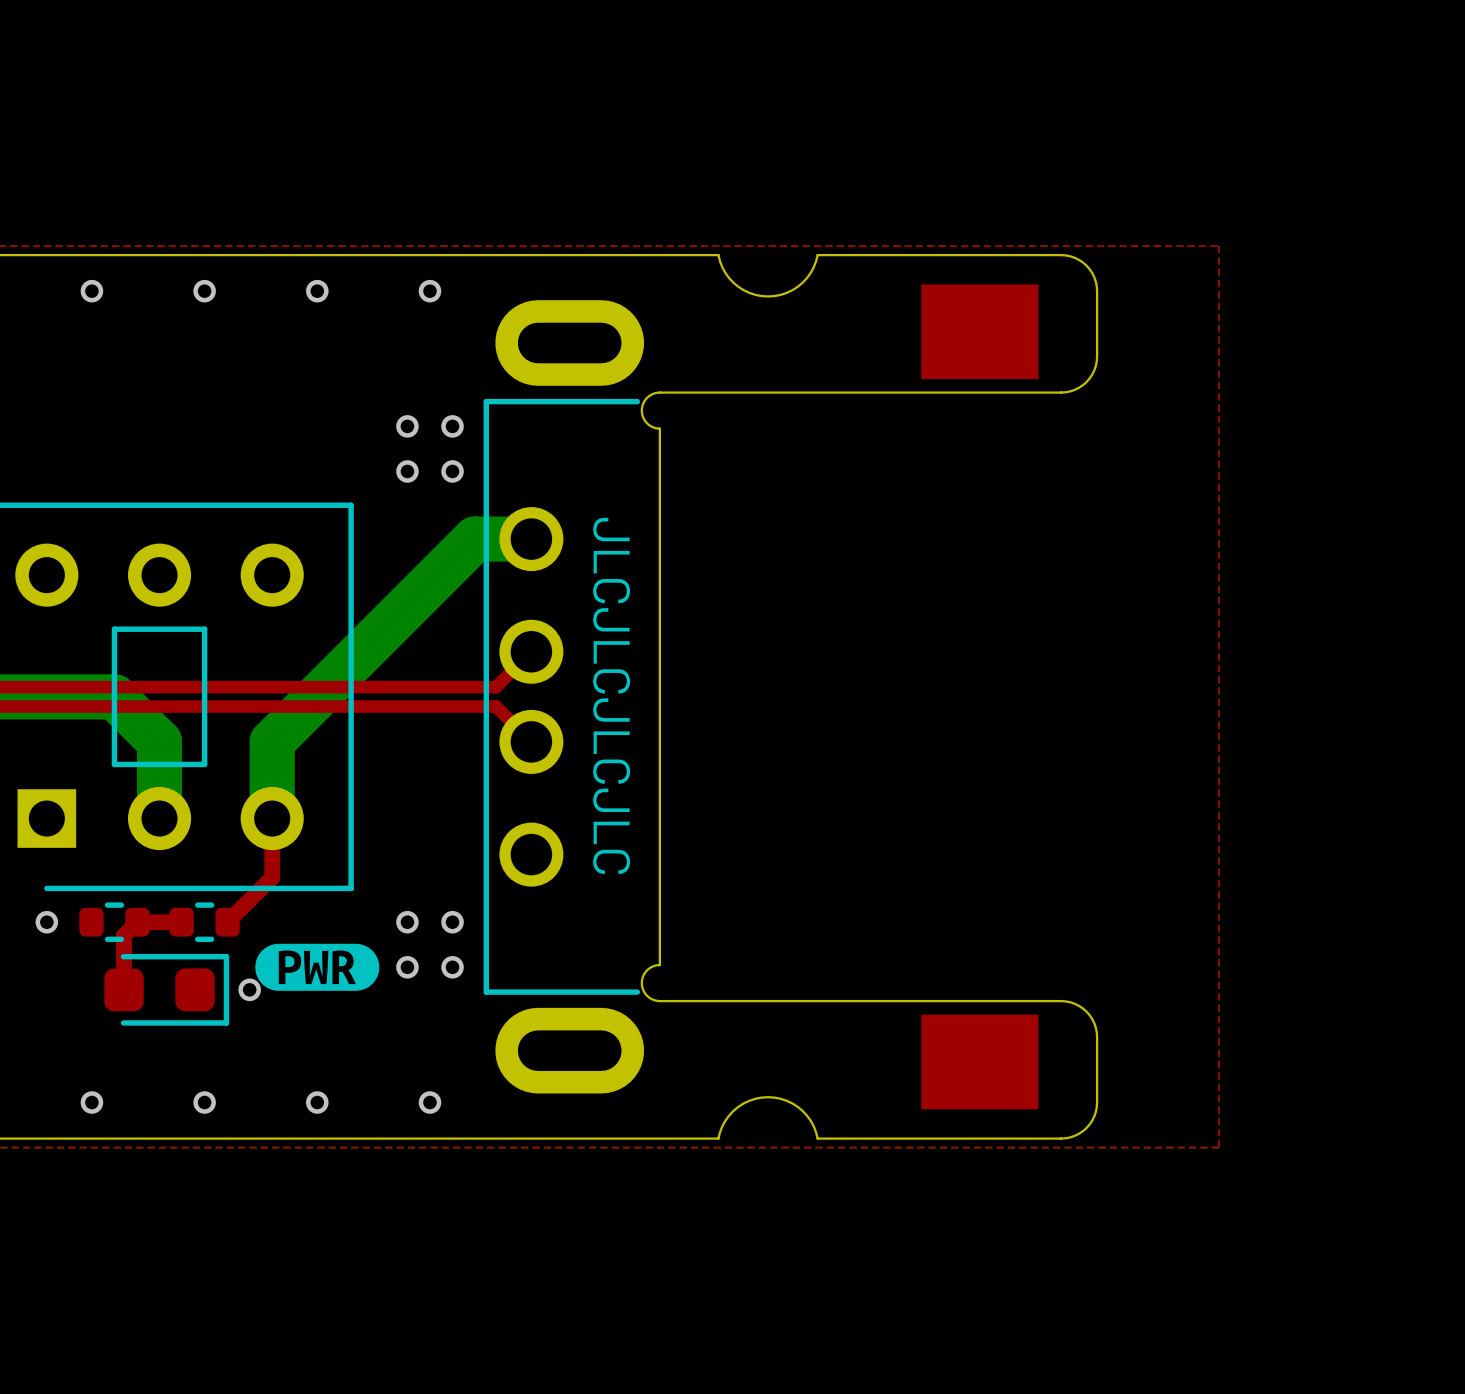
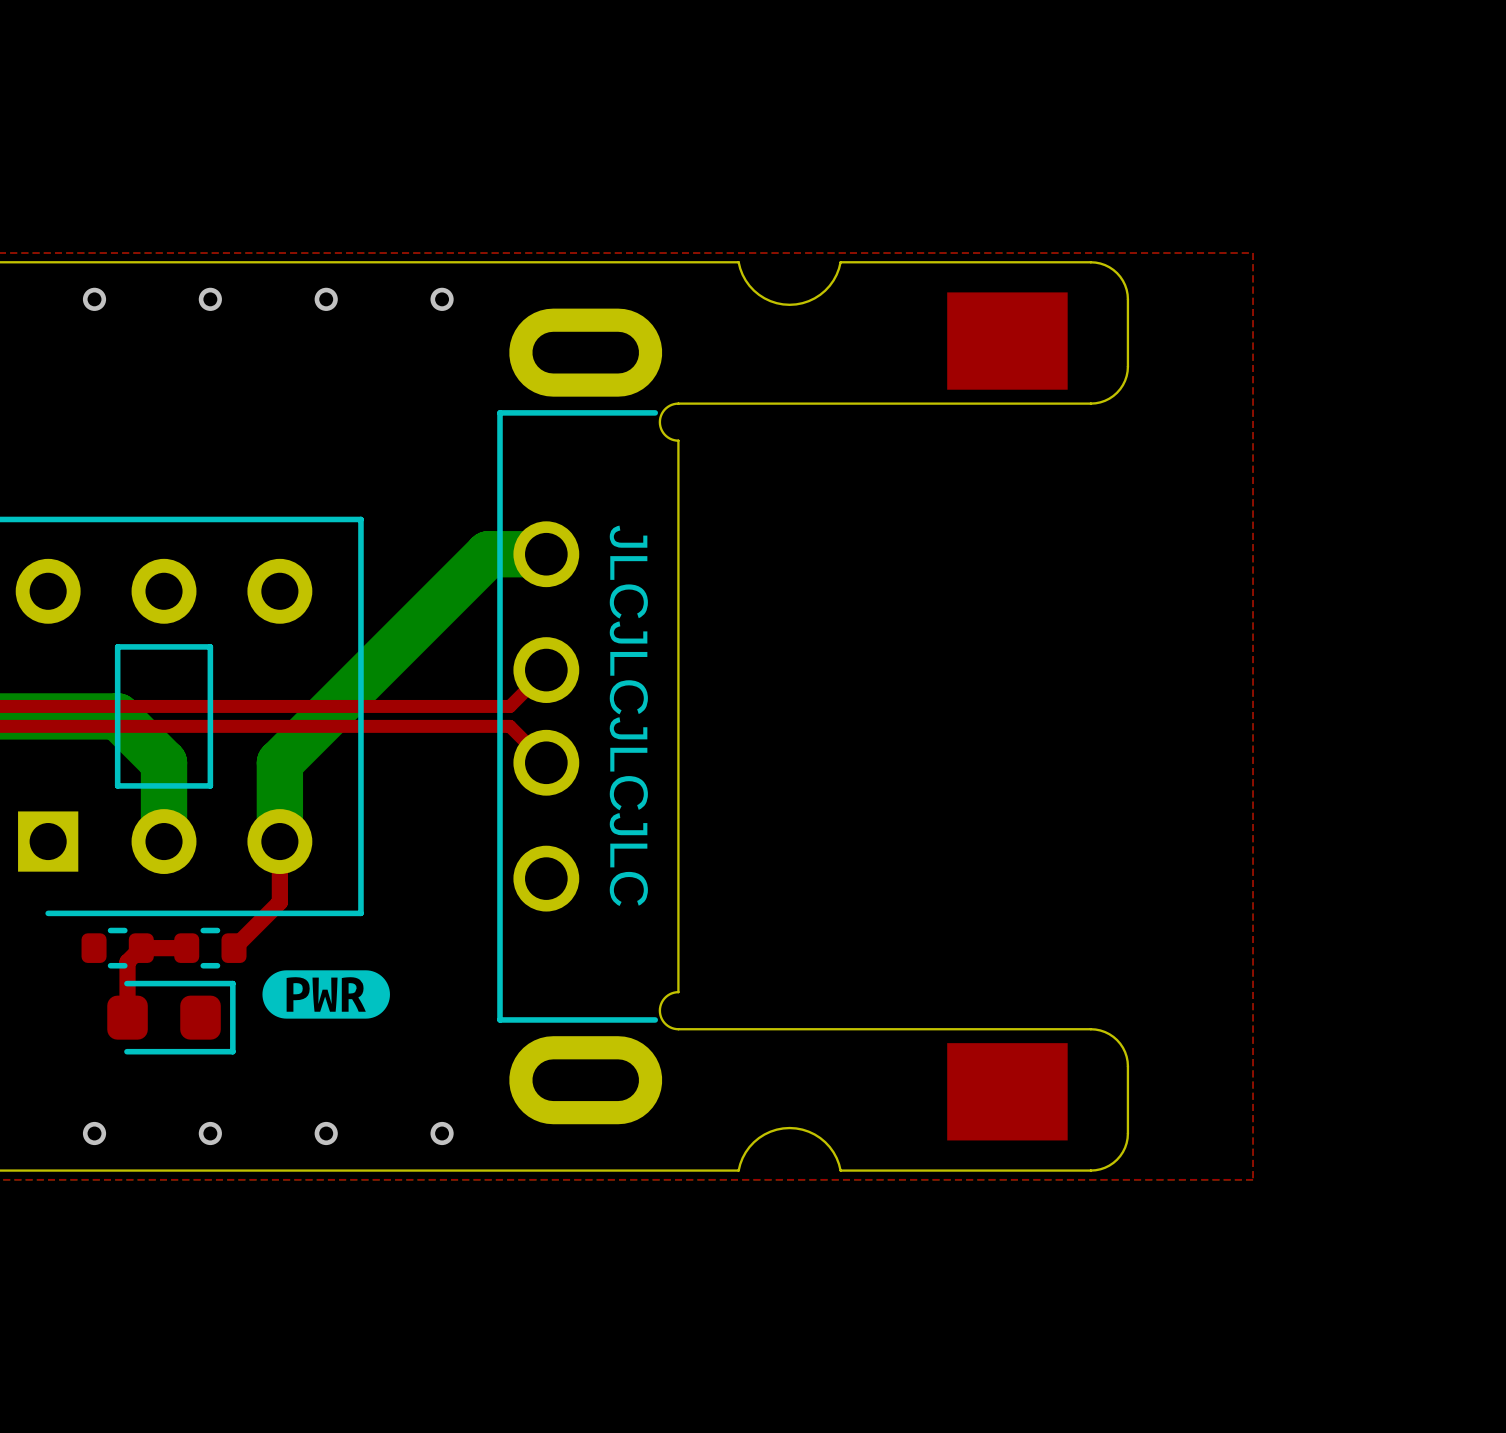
via: (407, 426) -> none
via: (452, 426) -> none
via: (407, 471) -> none
via: (452, 471) -> none
via: (46, 922) -> none
via: (407, 922) -> none
via: (452, 922) -> none
via: (407, 967) -> none
via: (452, 967) -> none
via: (249, 989) -> none

